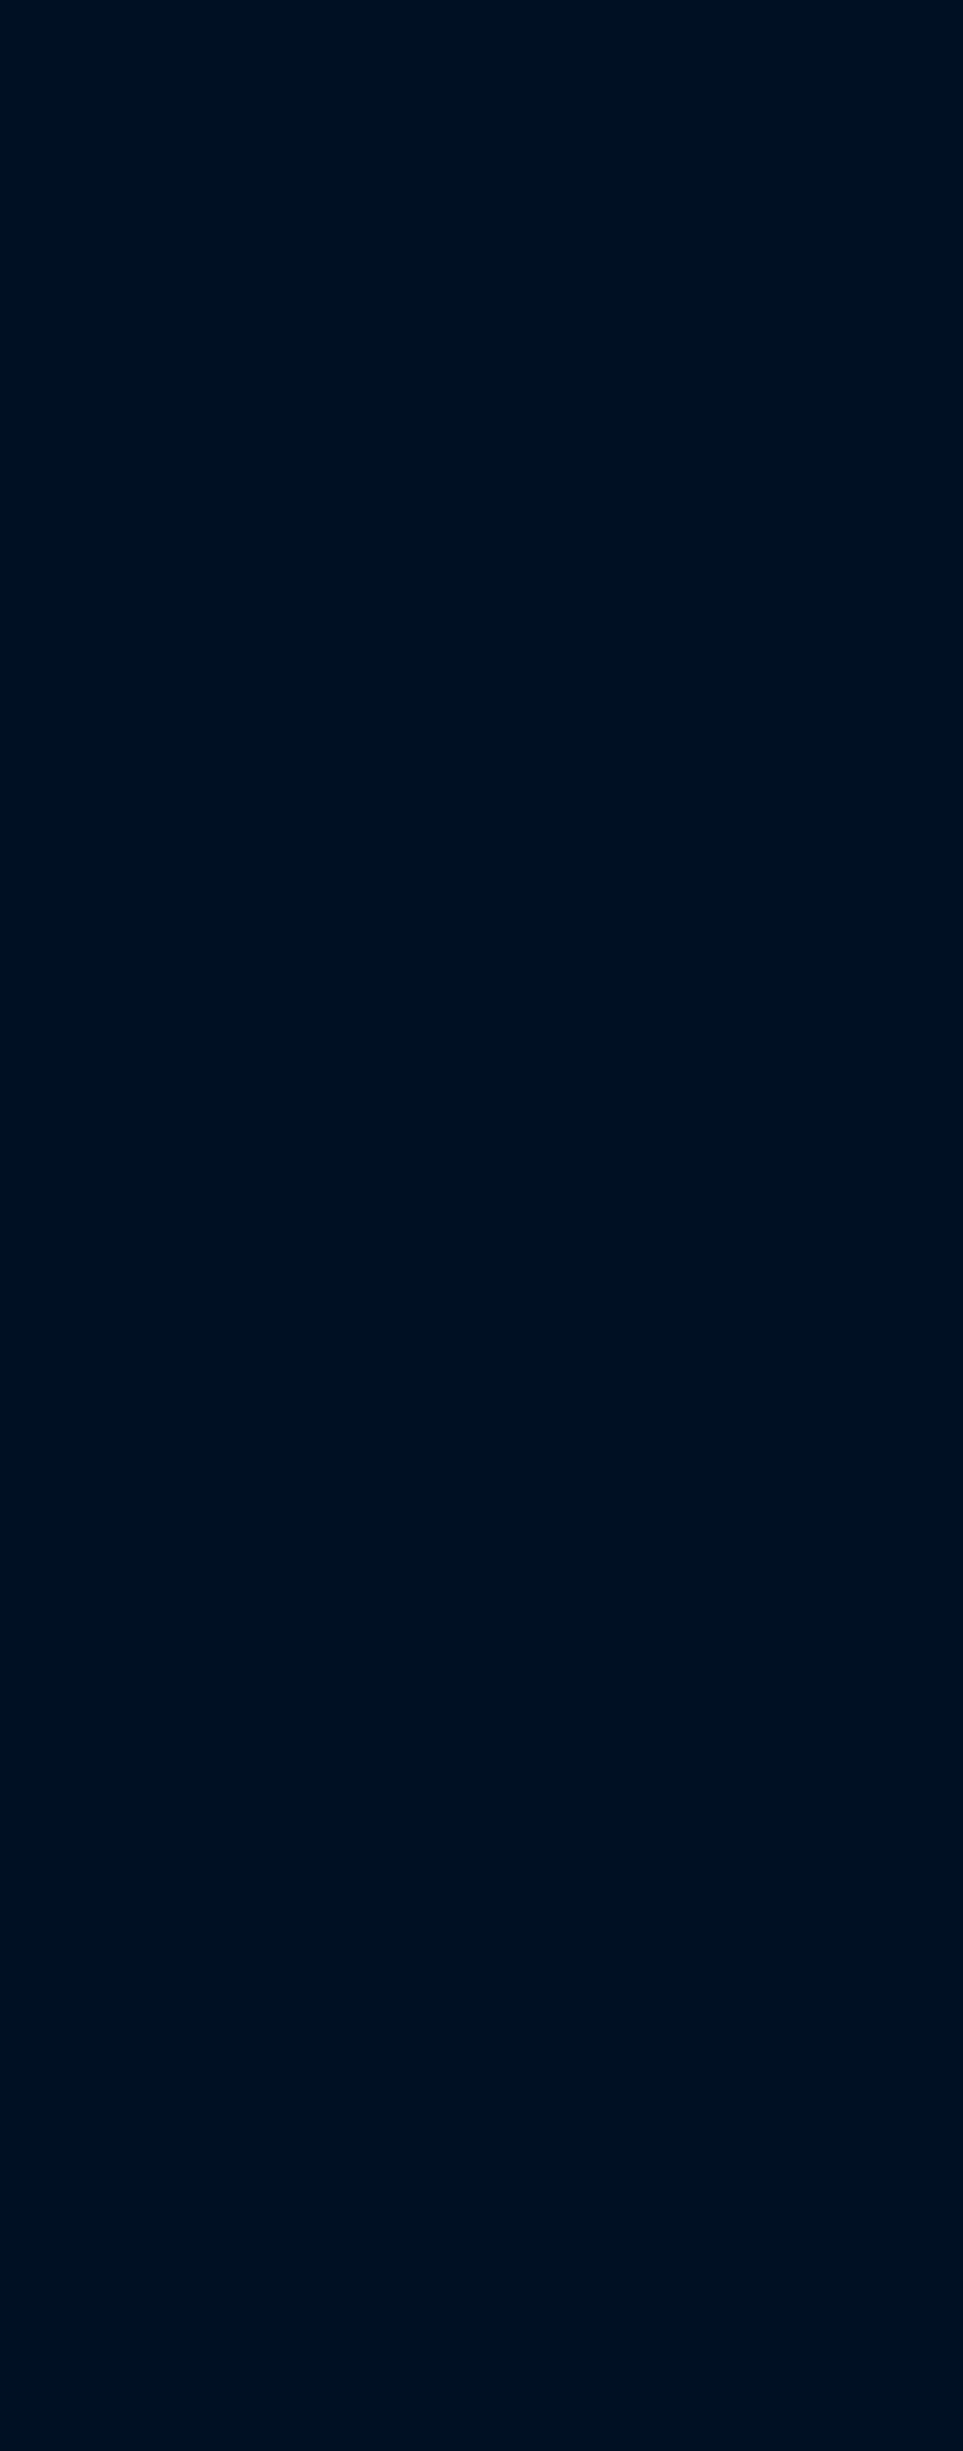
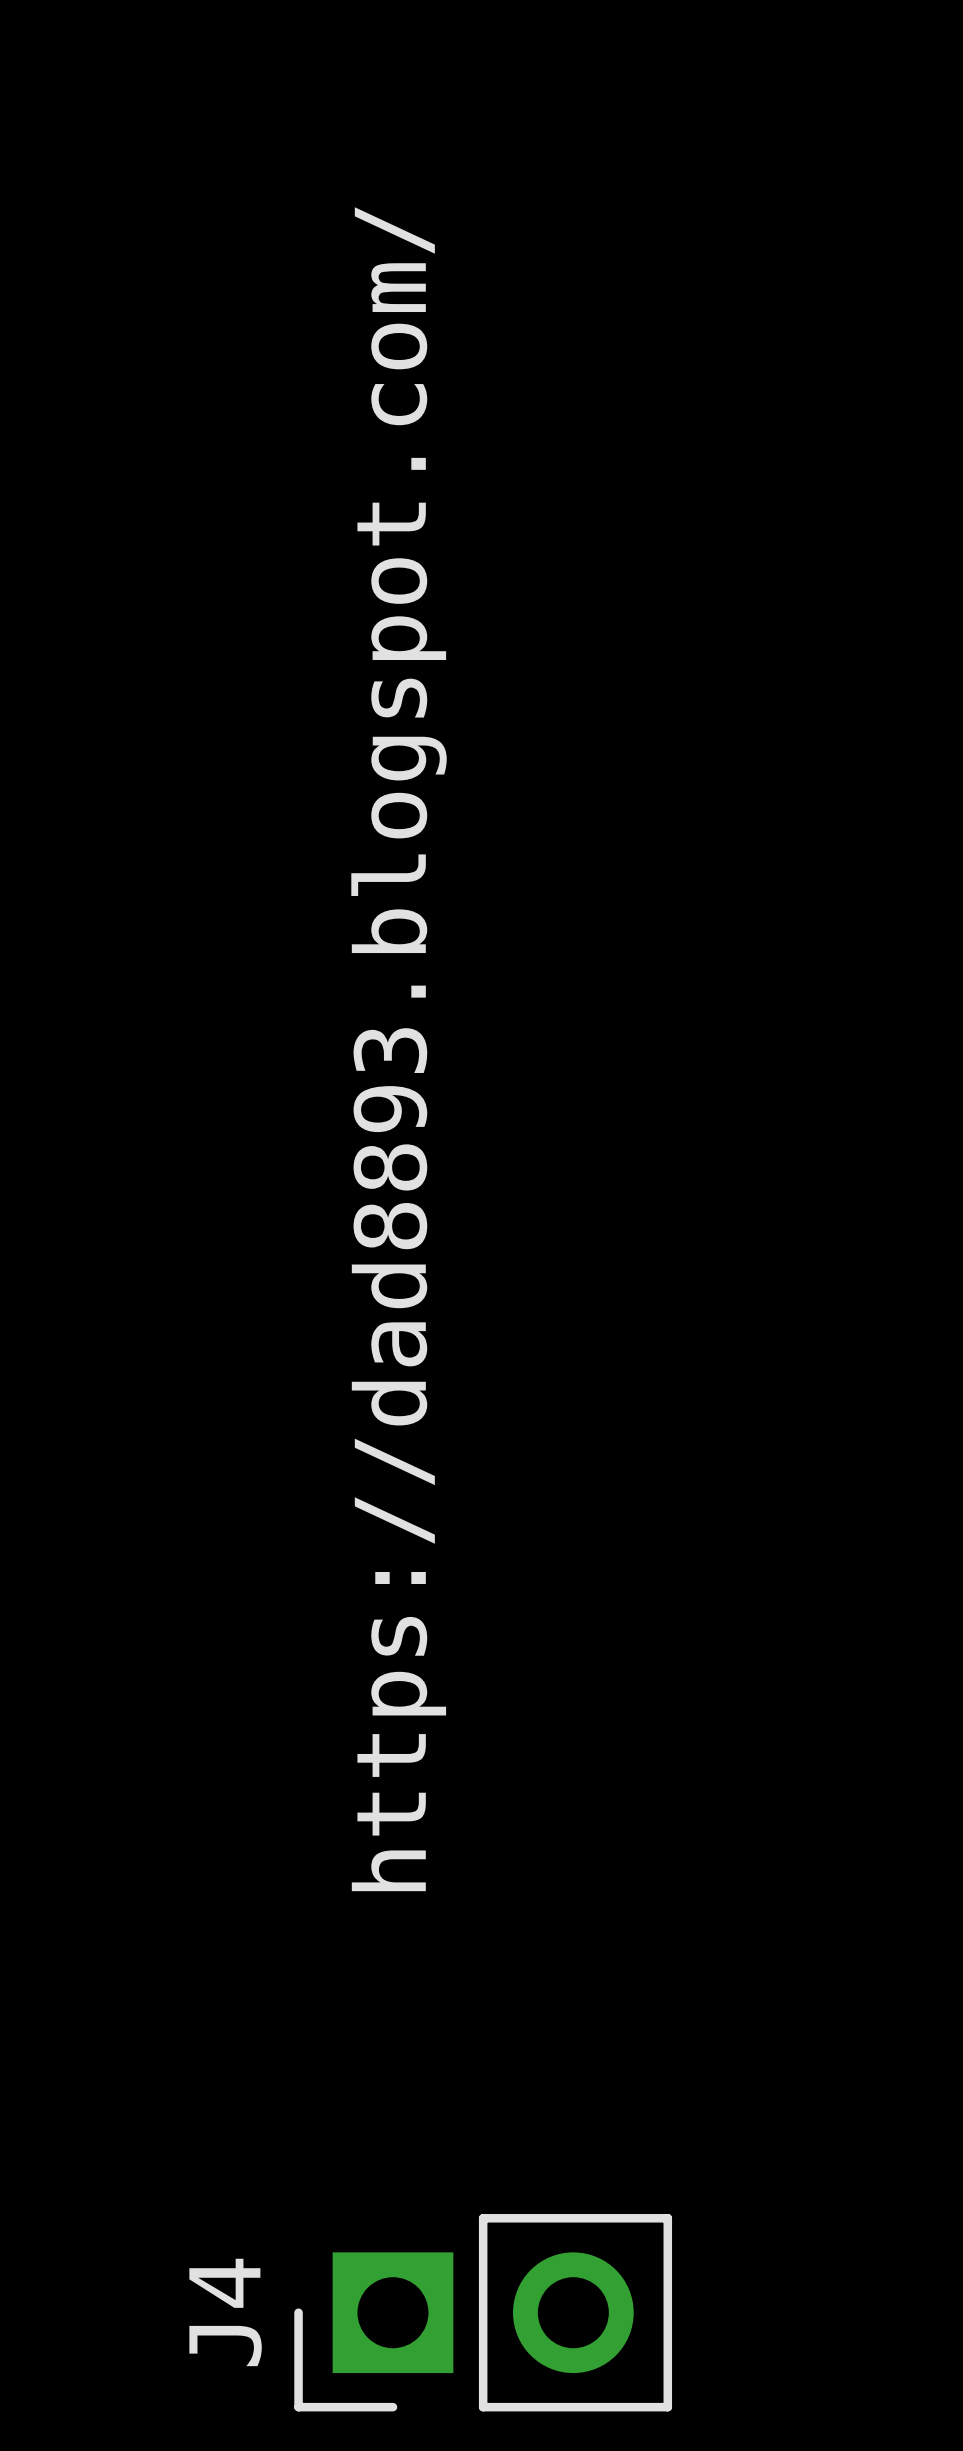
text: none -> https://dad8893.blogspot.com/ (399, 1049)
J4: none -> (483, 2312)

